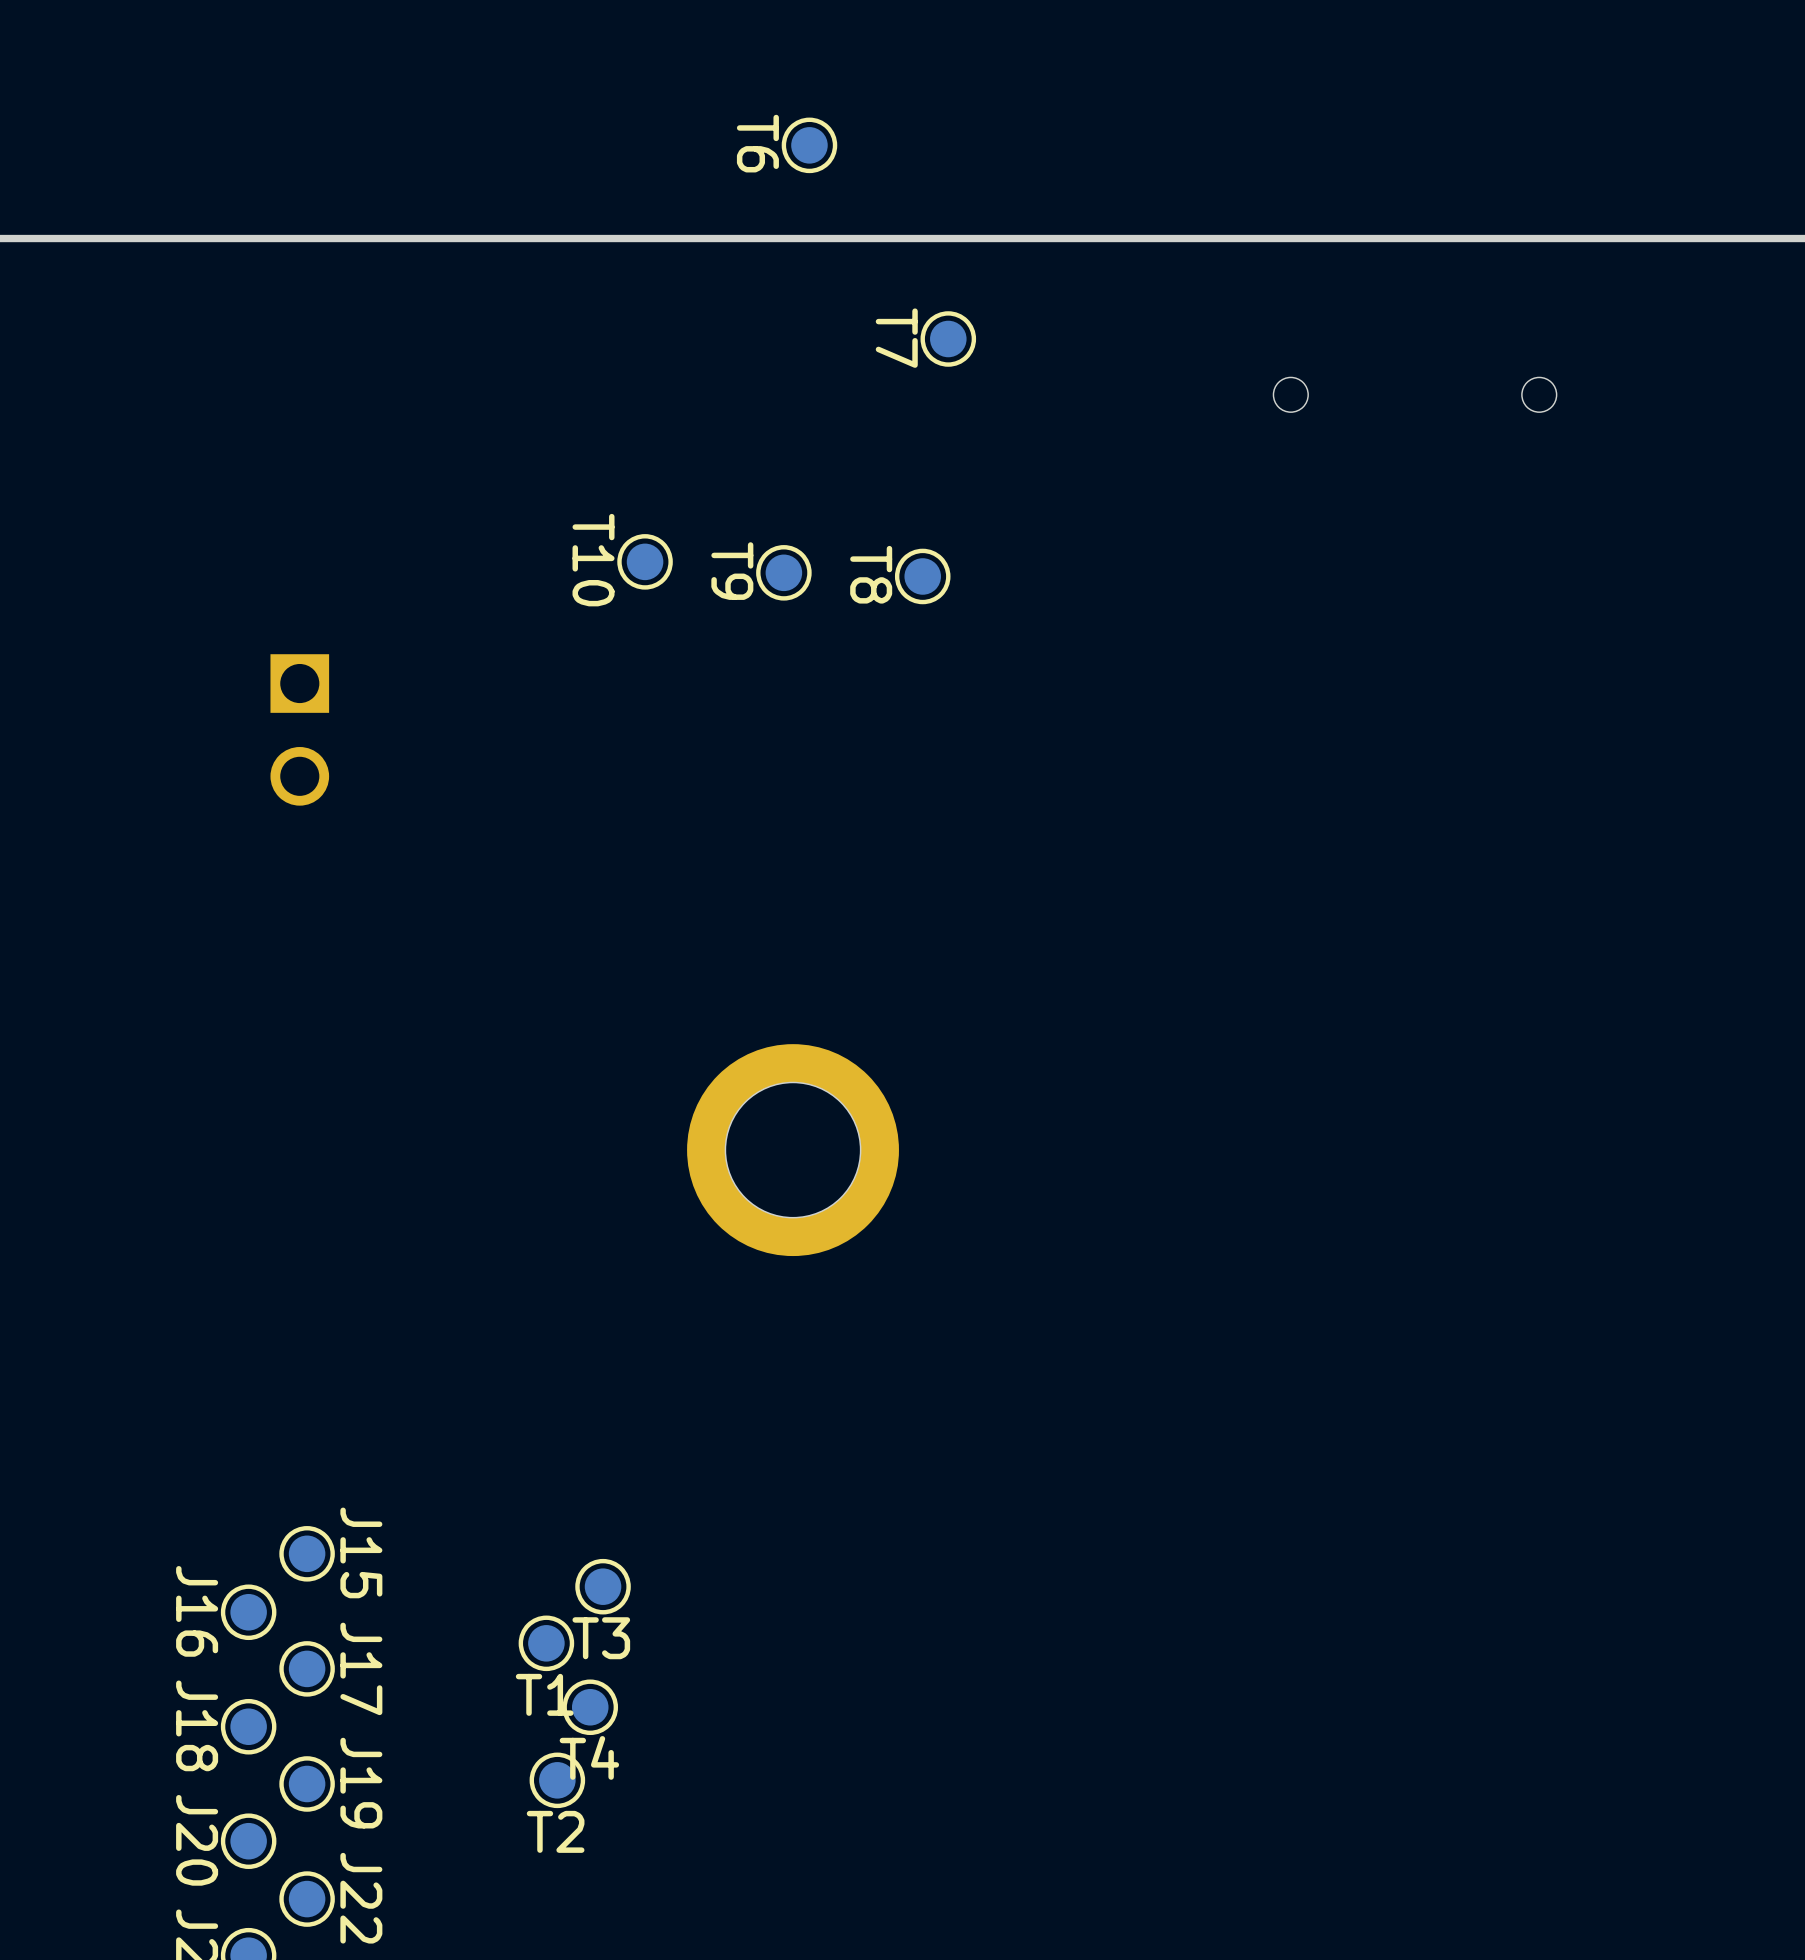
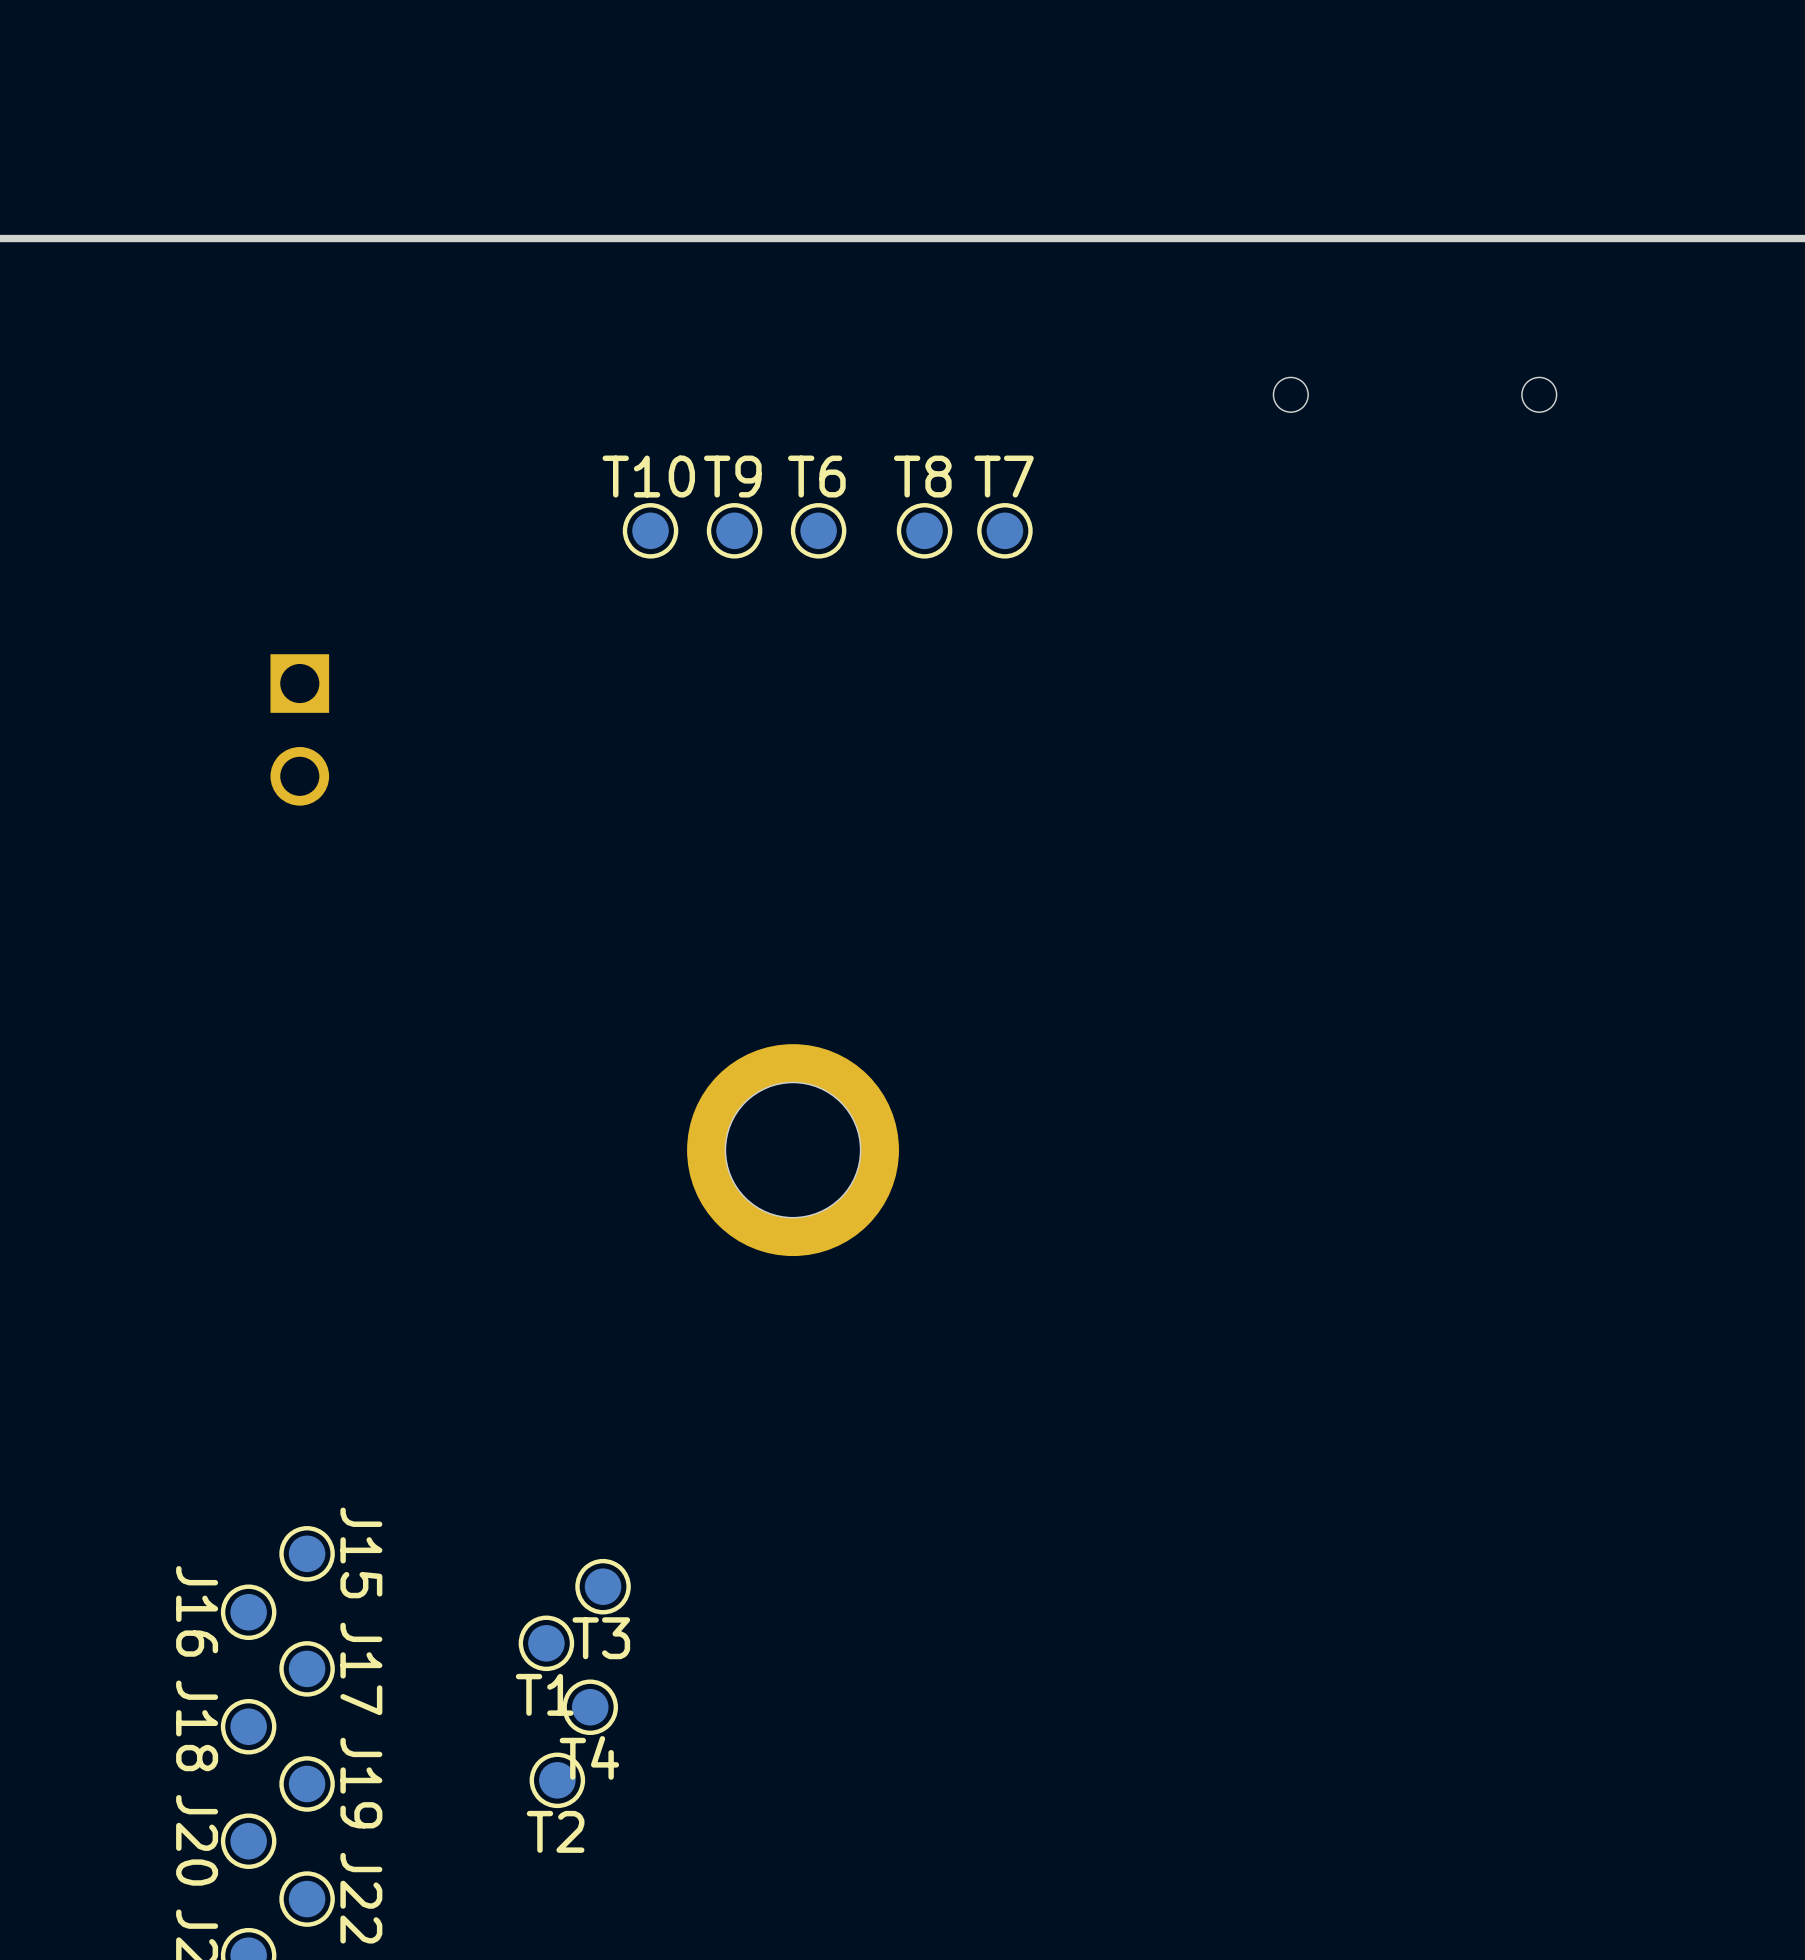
T6 name rotation: 0° (757, 143) -> 90° counterclockwise (816, 476)
T6 position: (809, 145) -> (818, 530)
T7 name rotation: 0° (896, 338) -> 90° counterclockwise (1004, 476)
T7 position: (948, 338) -> (1004, 530)
T10 name rotation: 0° (593, 560) -> 90° counterclockwise (648, 476)
T10 position: (645, 561) -> (650, 530)
T9 name rotation: 0° (732, 571) -> 90° counterclockwise (732, 476)
T9 position: (783, 572) -> (734, 530)
T8 name rotation: 0° (871, 574) -> 90° counterclockwise (922, 476)
T8 position: (922, 576) -> (924, 530)

